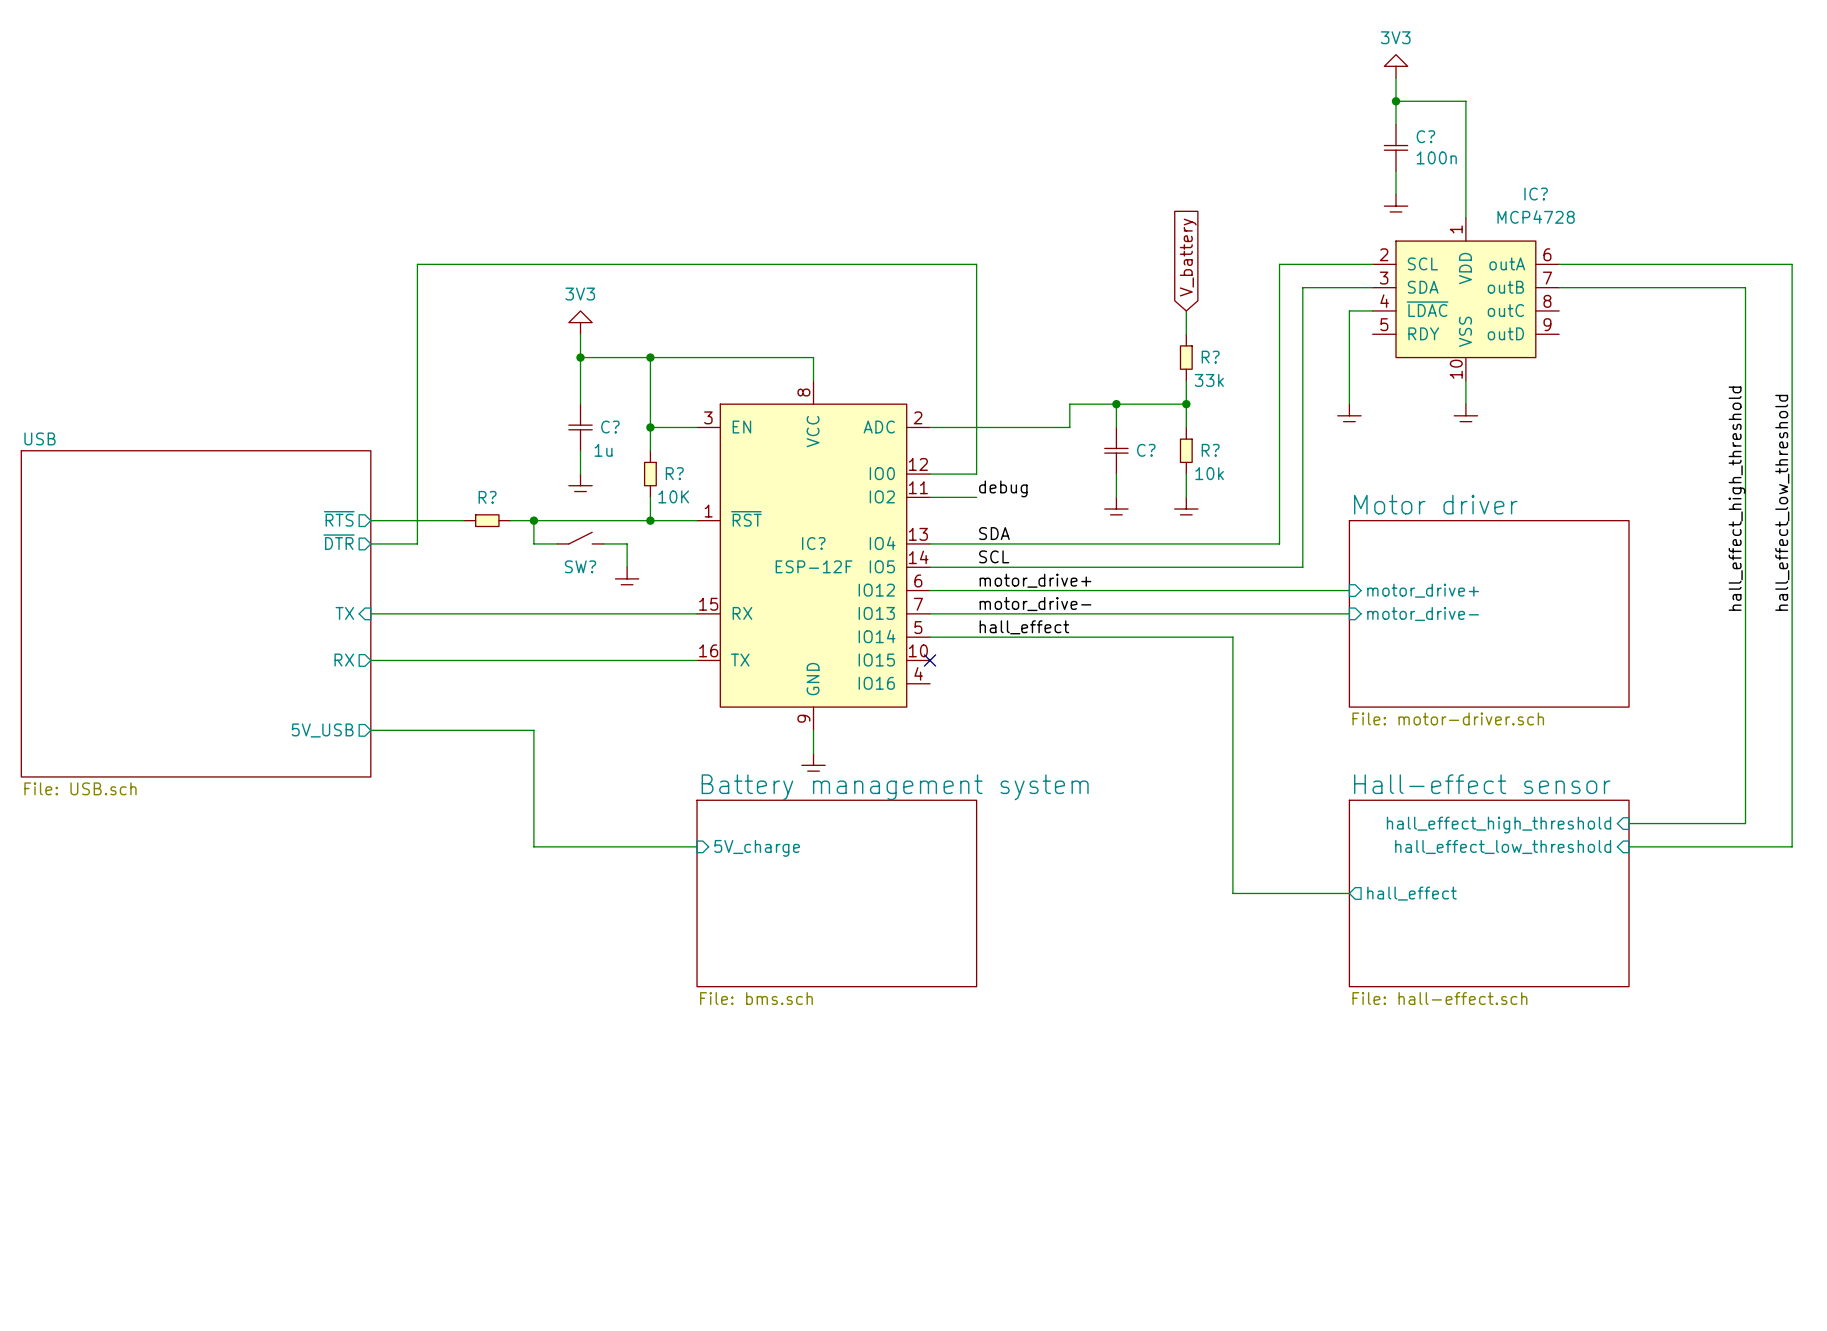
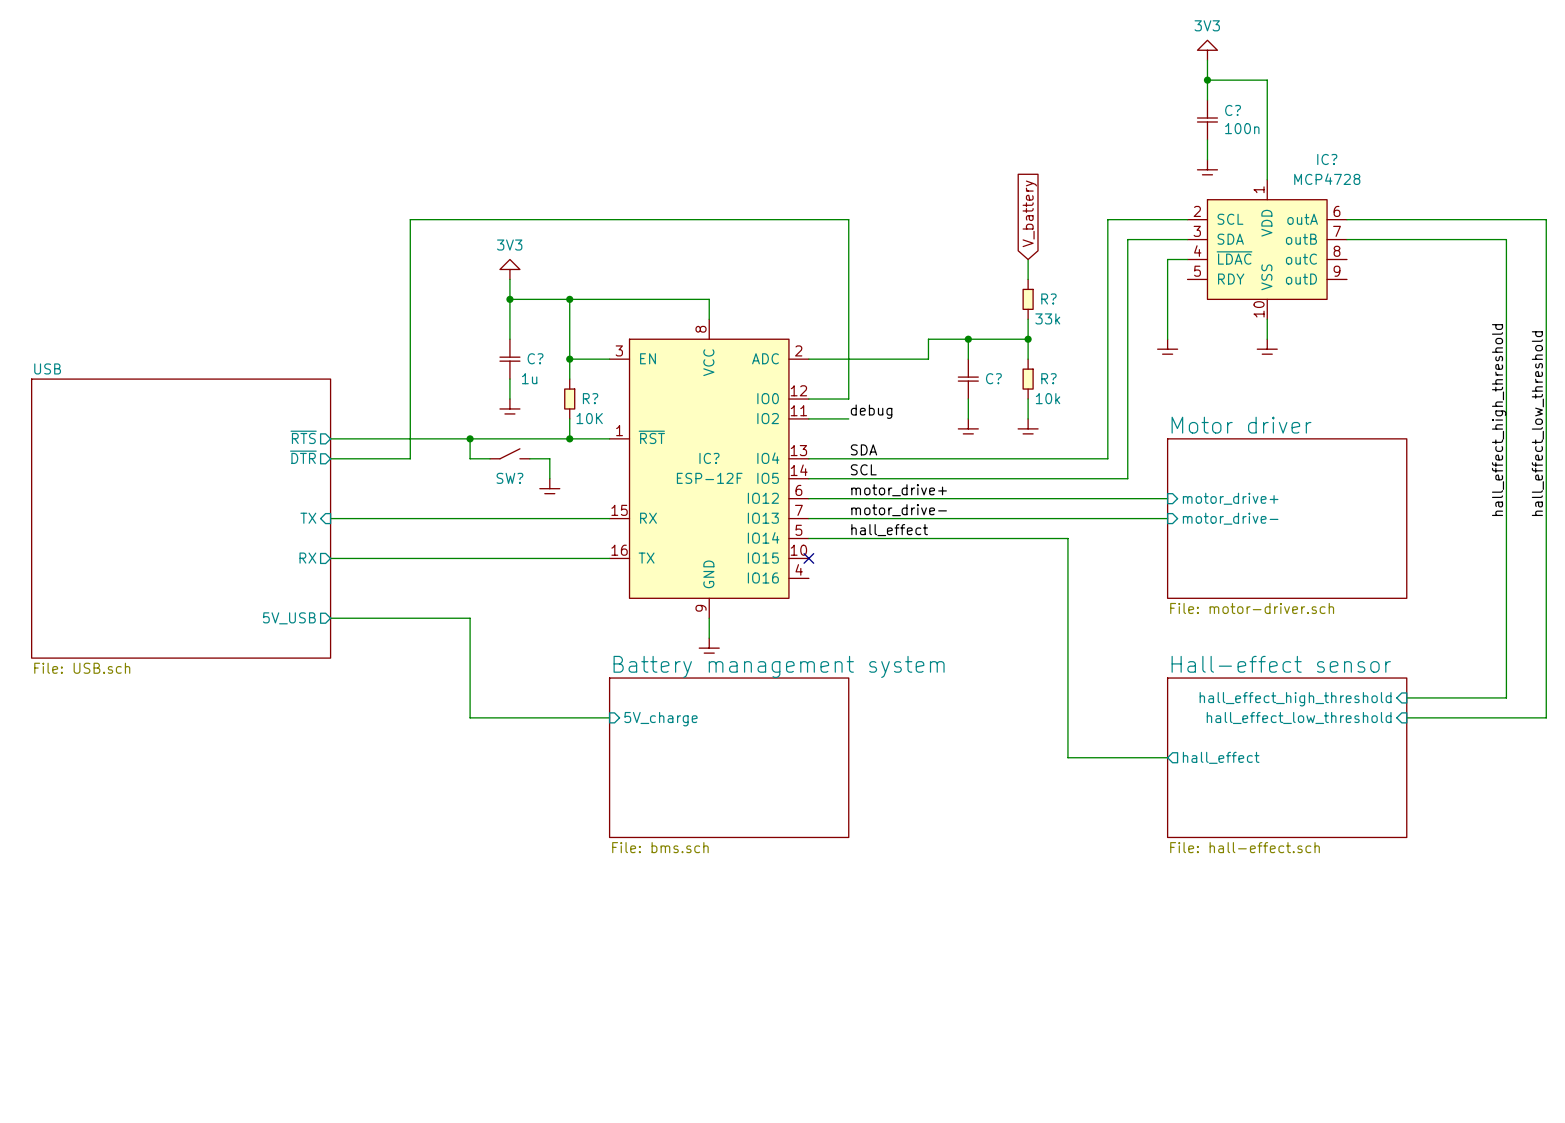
wire: (464, 264) (417, 264) (417, 543) -> (410, 219) (410, 458) (370, 458)
R?: (487, 520) -> none

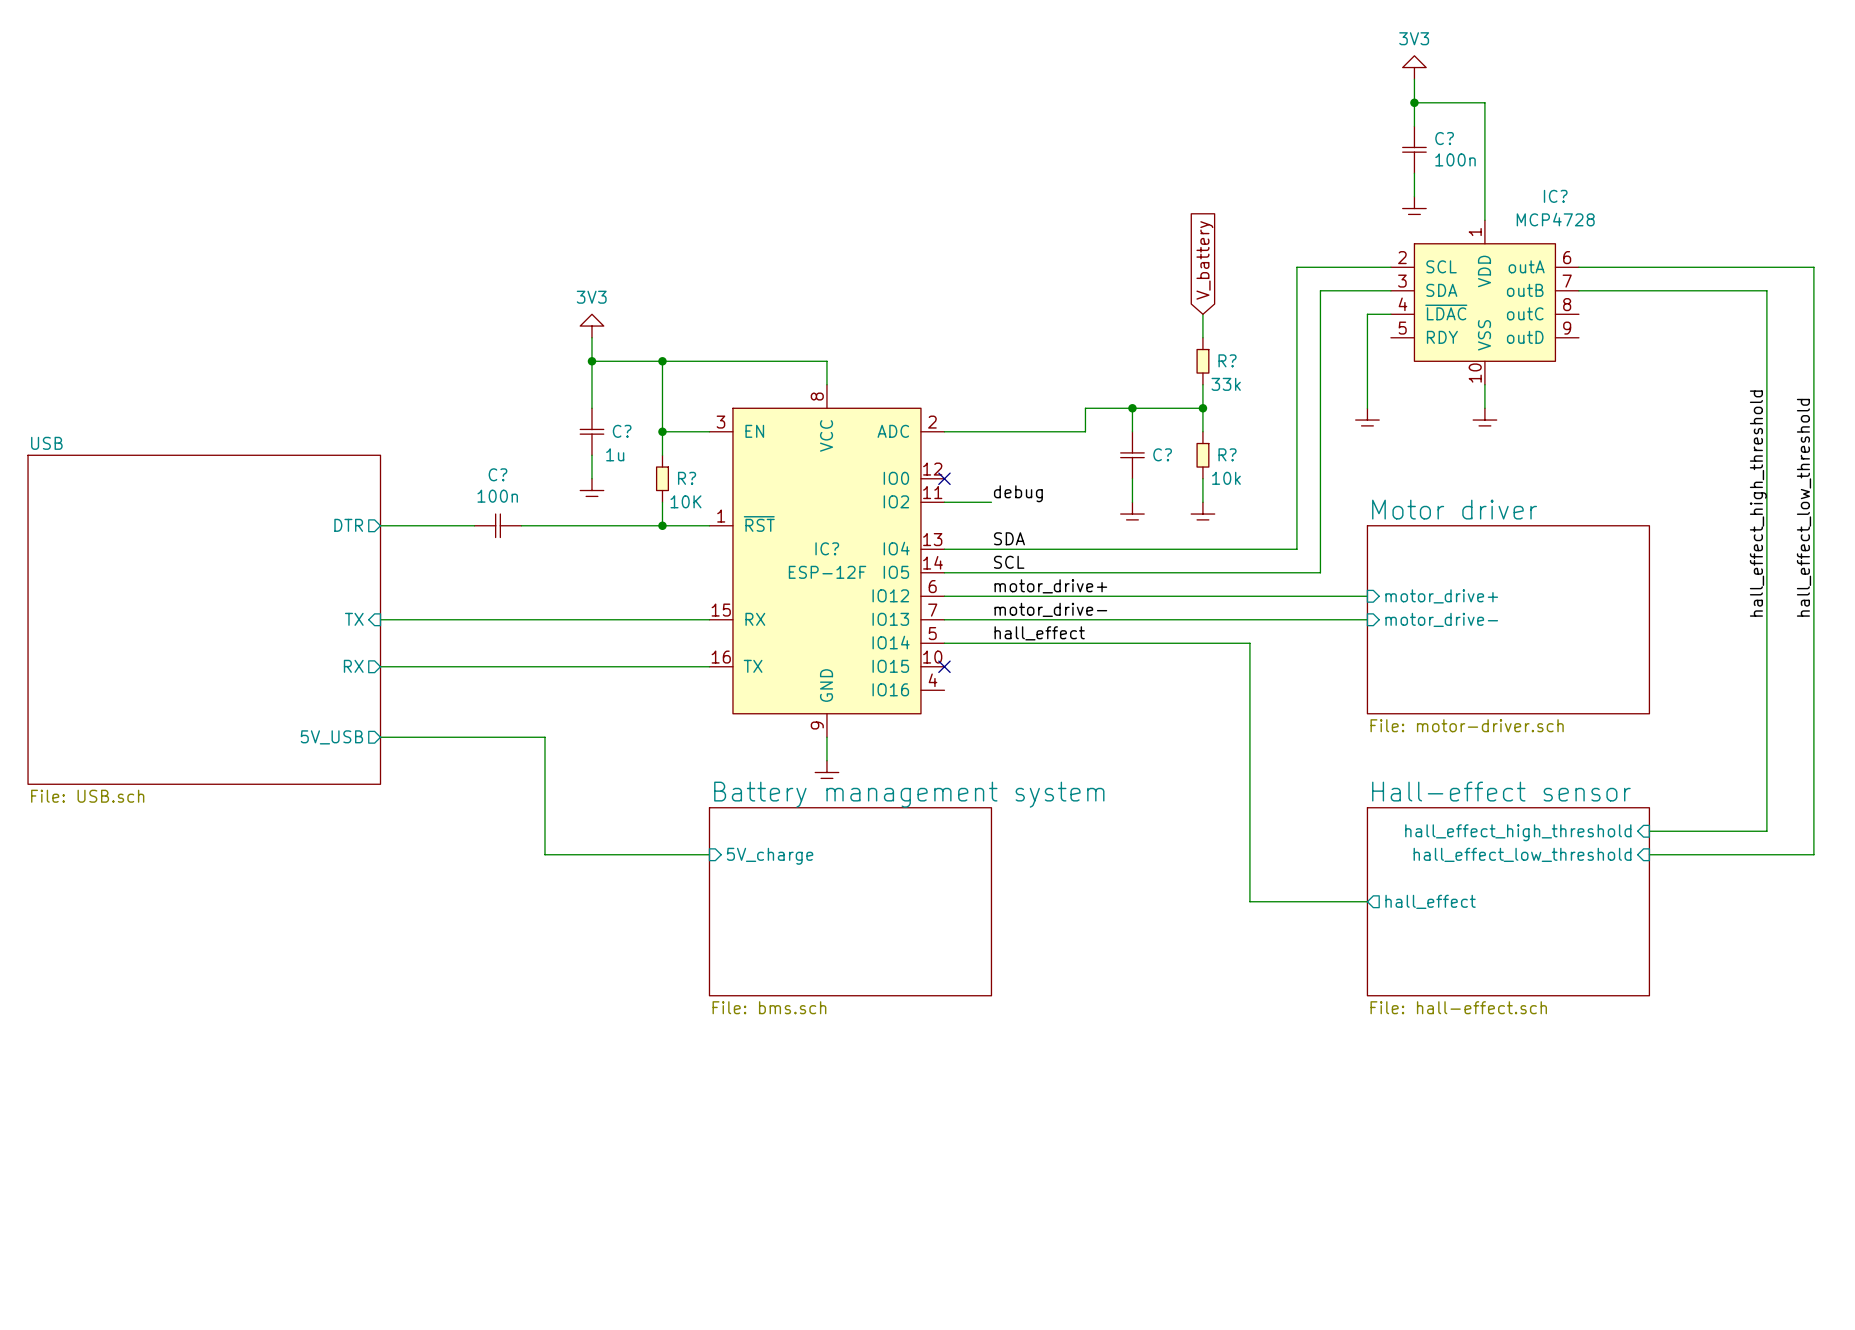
wire: (808, 399) (848, 399) (848, 219) (410, 219) (410, 458) (330, 458) -> none
no-connect mark: none -> (944, 478)
sheet pin: ~{RTS} (303, 437) -> DTR (348, 525)
C?: none -> 100n (497, 525)
wire: (470, 438) (470, 458) (490, 458) -> none
junction: (470, 438) -> none
SW?: (509, 453) -> none
sheet pin: ~{DTR} (303, 457) -> none
wire: (529, 458) (549, 458) (549, 478) -> none
power symbol: (549, 488) -> none

